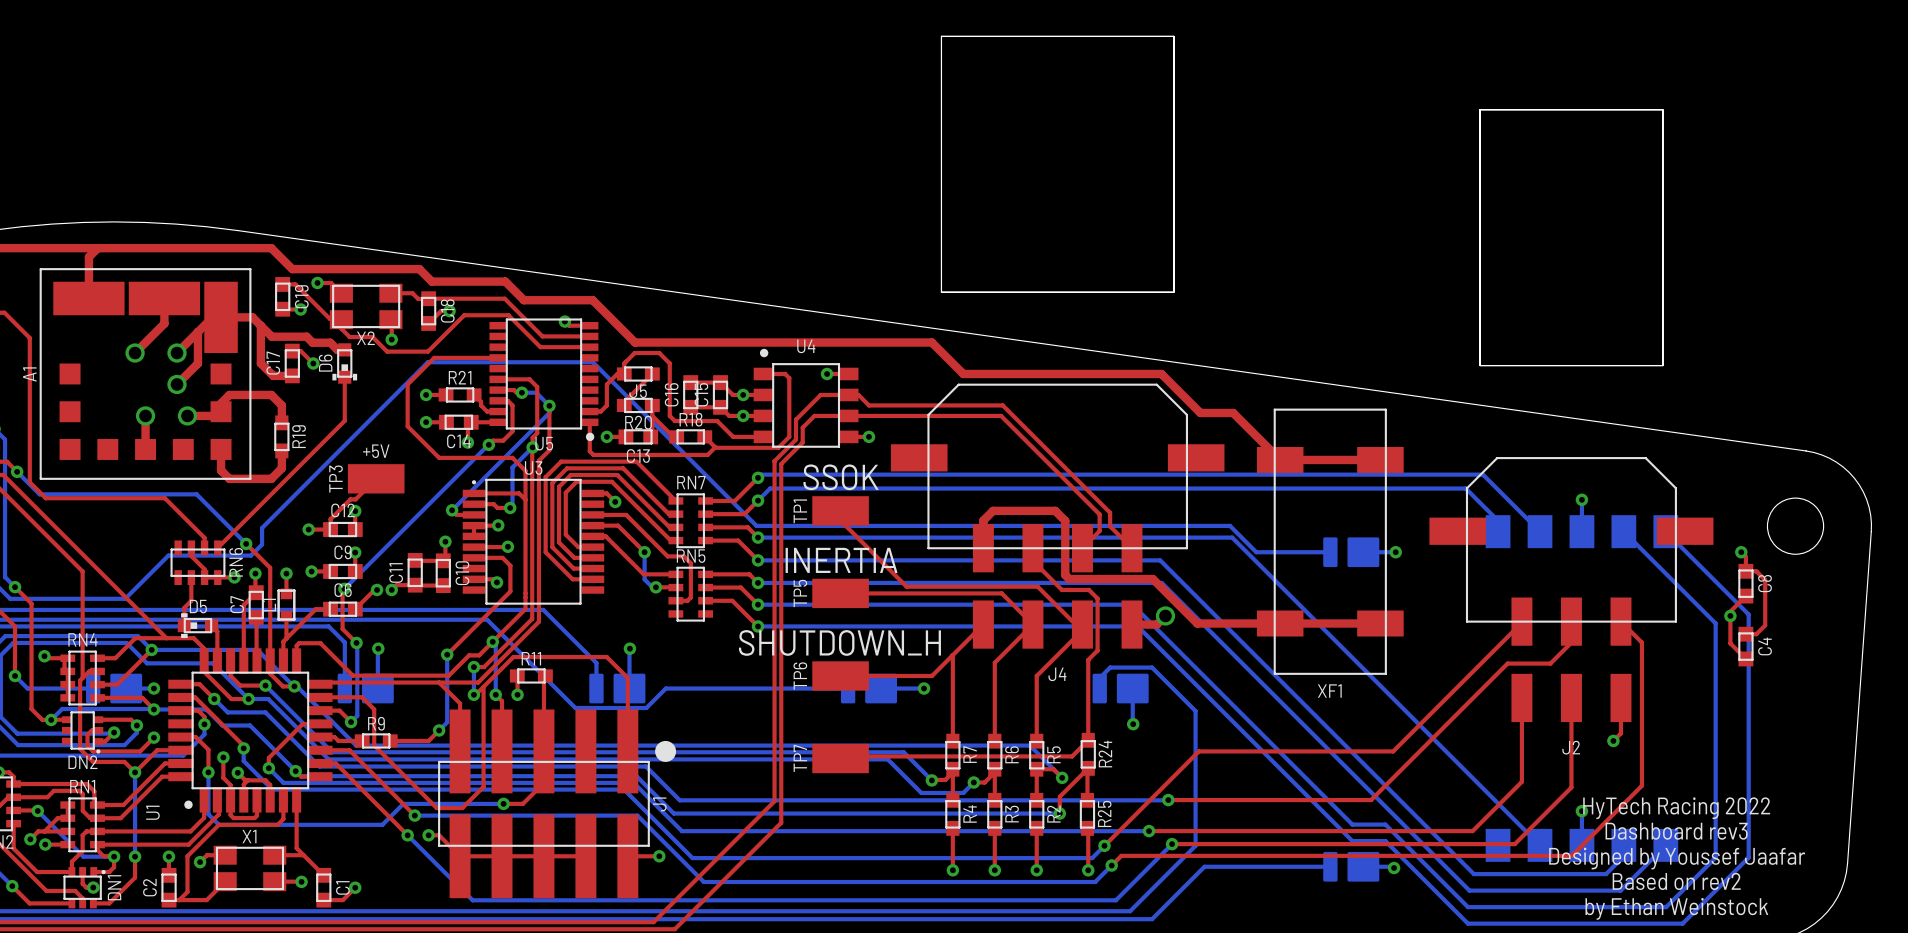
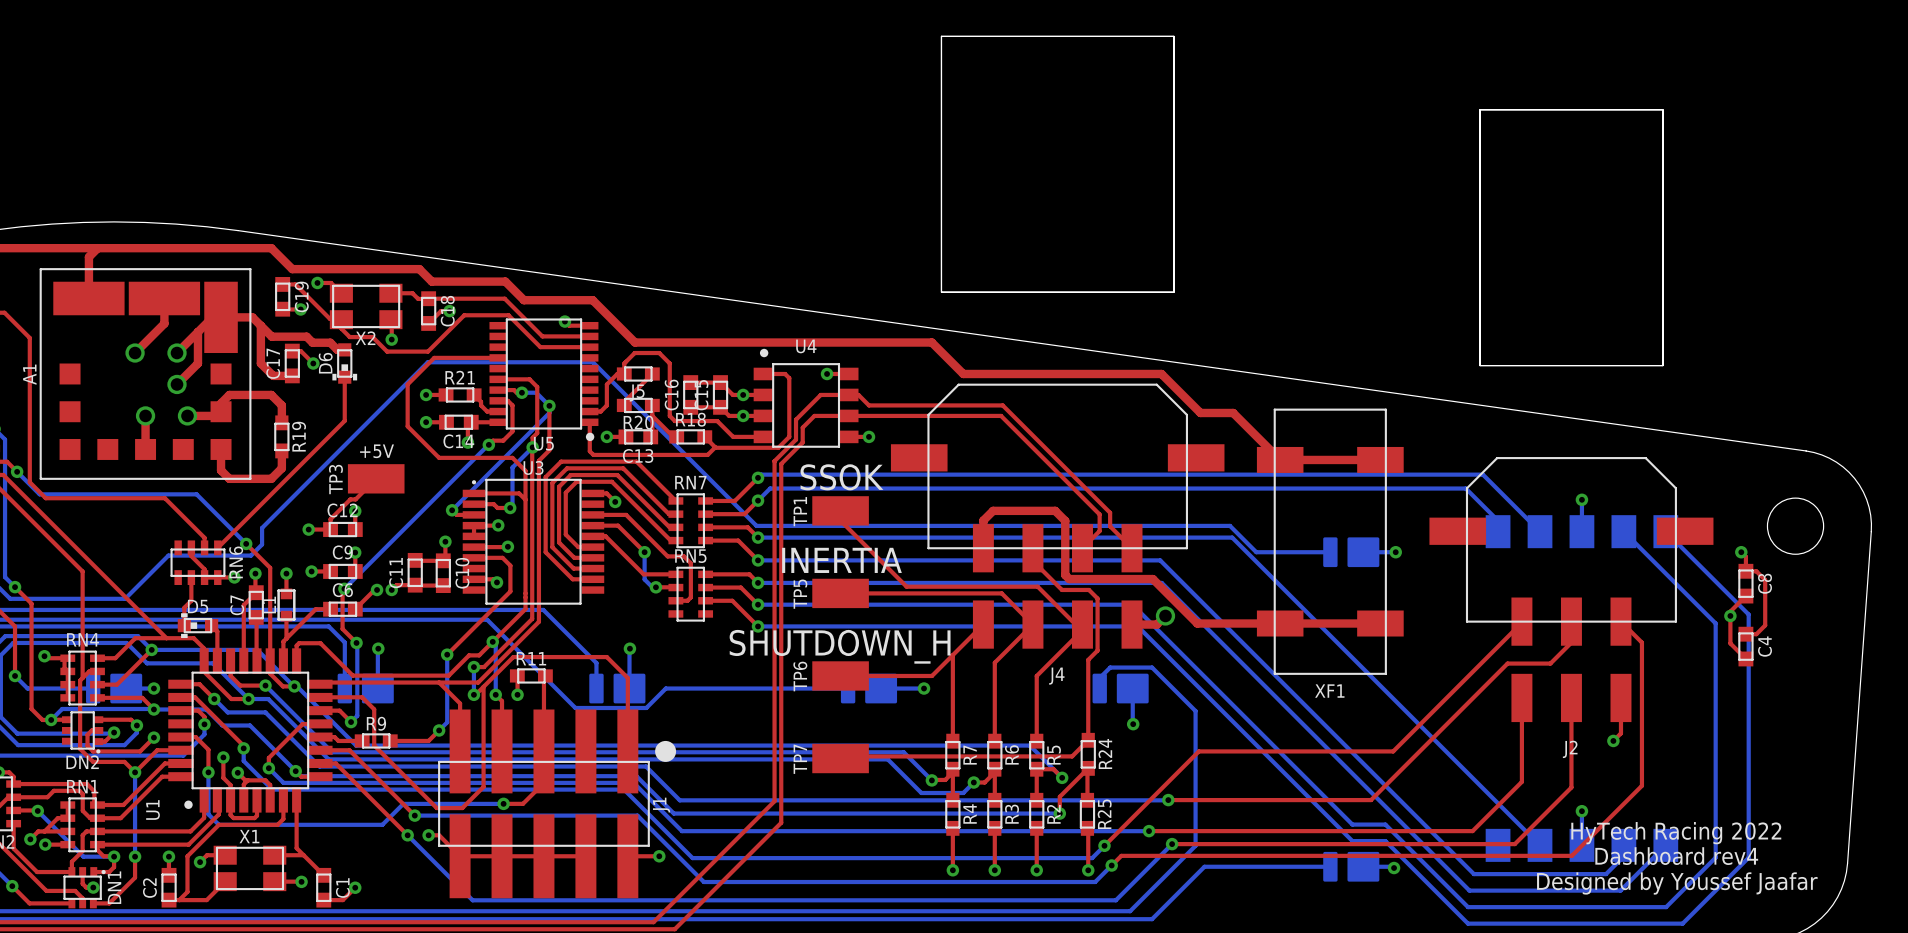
text: HyTech Racing 2022 (1676, 808) -> none
text: Dashboard rev3 (1676, 831) -> HyTech Racing 2022 (1676, 833)
text: Designed by Youssef Jaafar (1677, 858) -> Dashboard rev4 (1676, 856)
text: Based on rev2 (1676, 881) -> Designed by Youssef Jaafar (1677, 883)
text: by Ethan Weinstock (1676, 908) -> none

